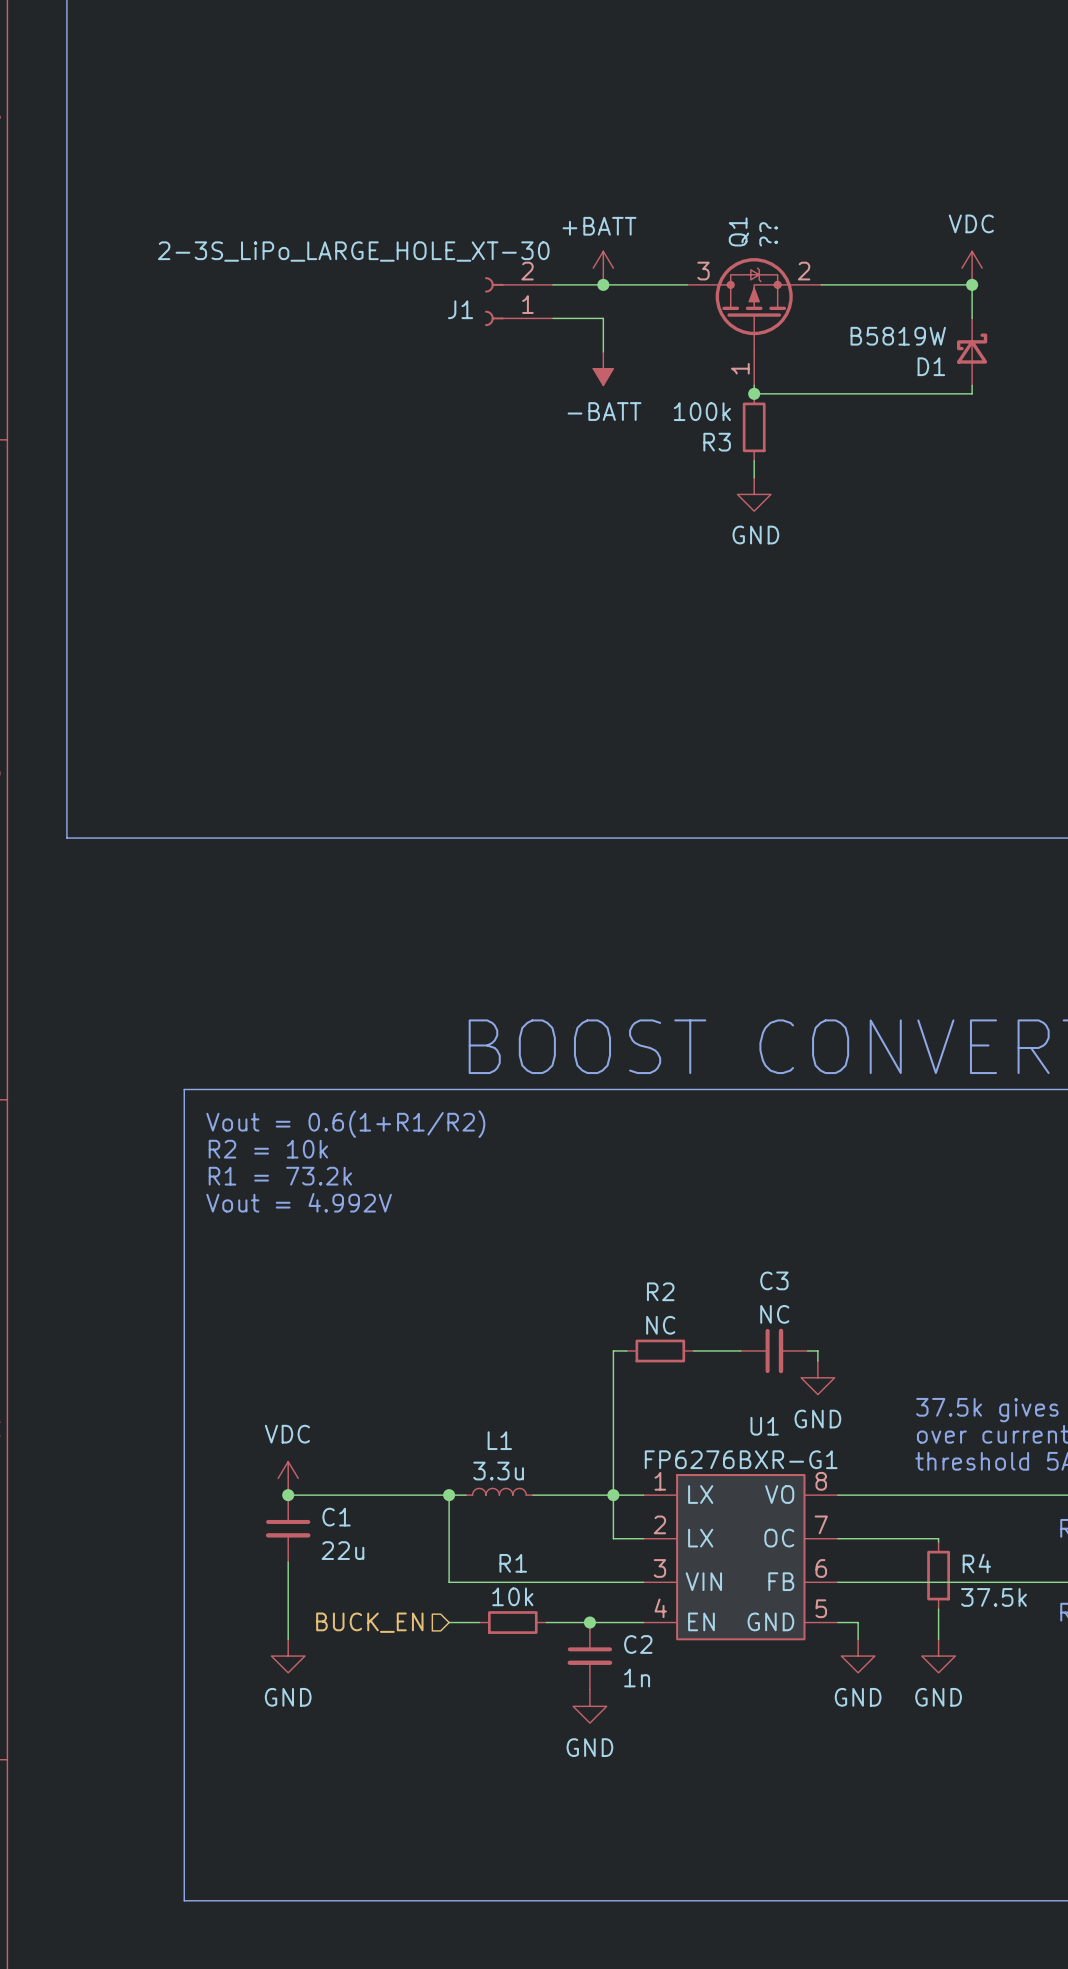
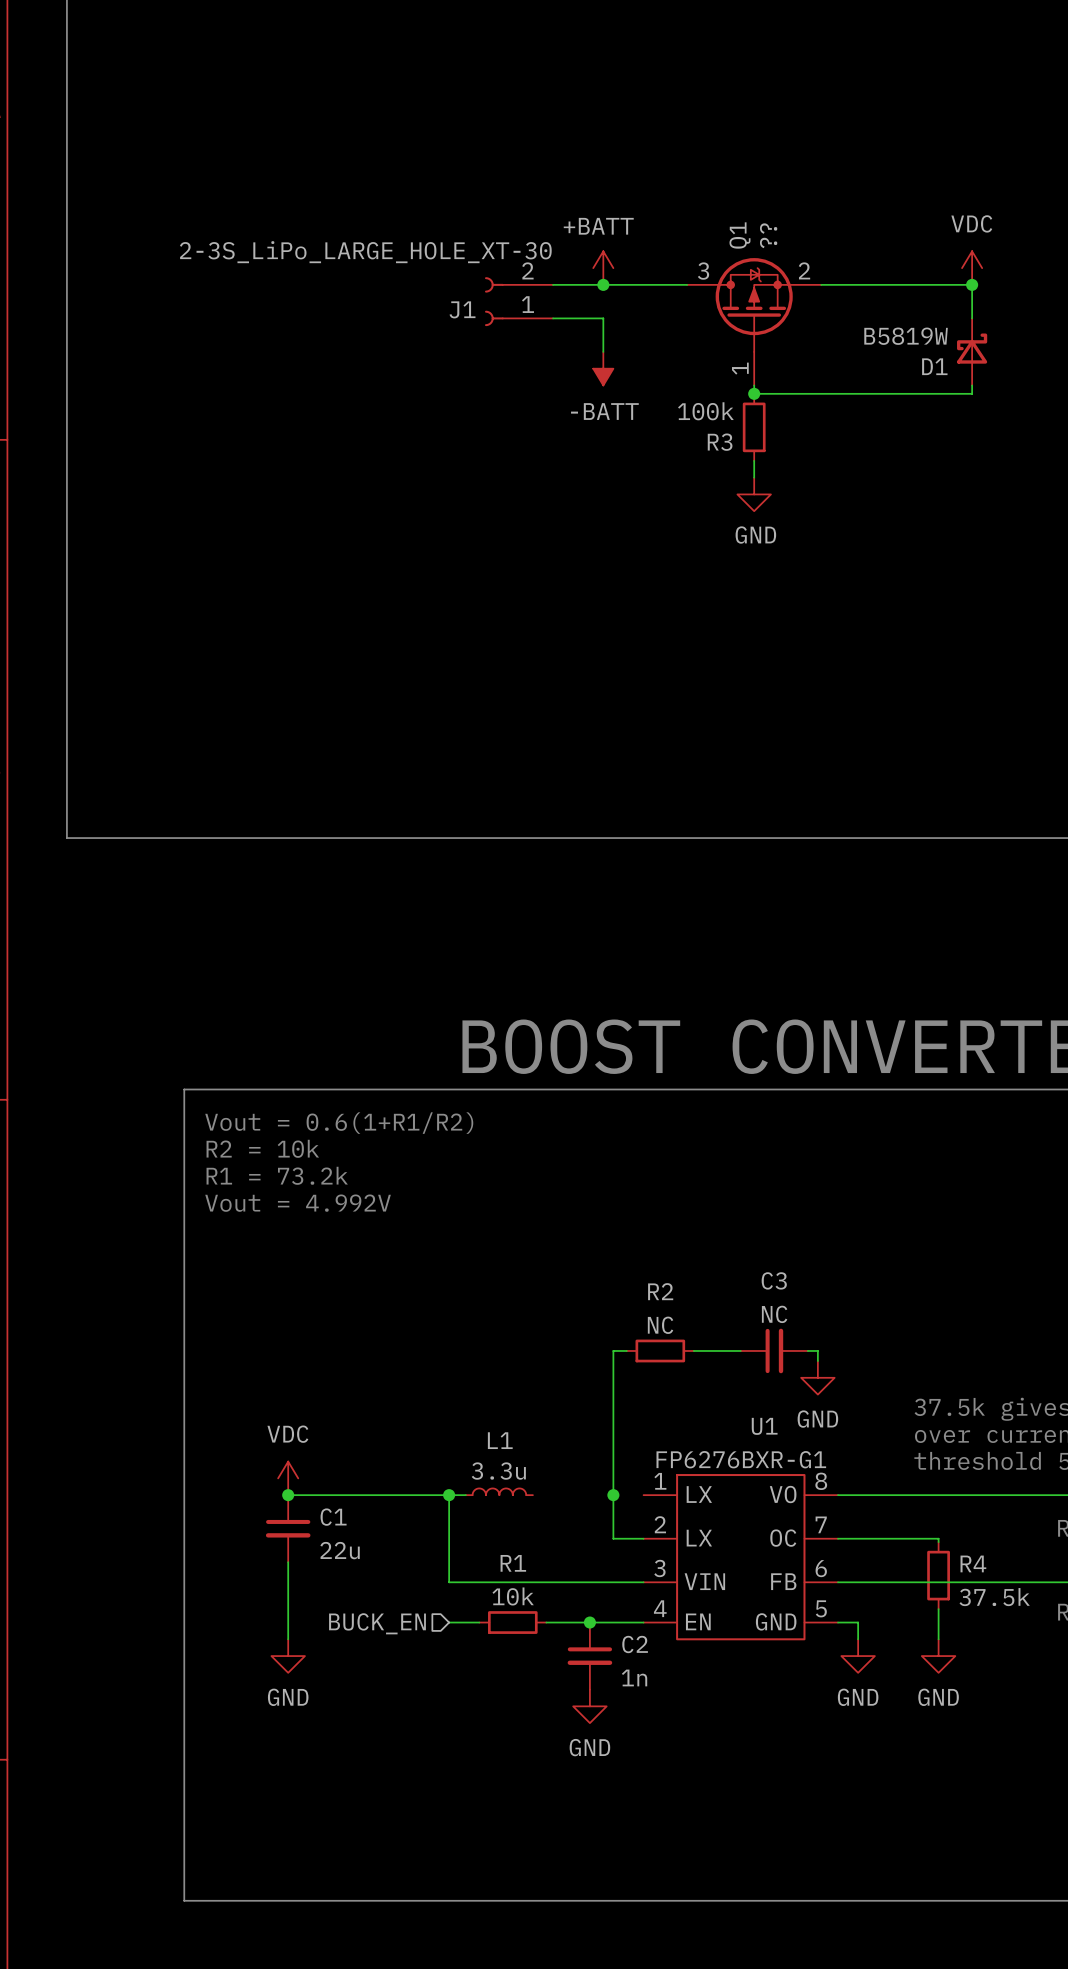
wire: (532, 1495) (643, 1495) -> none

